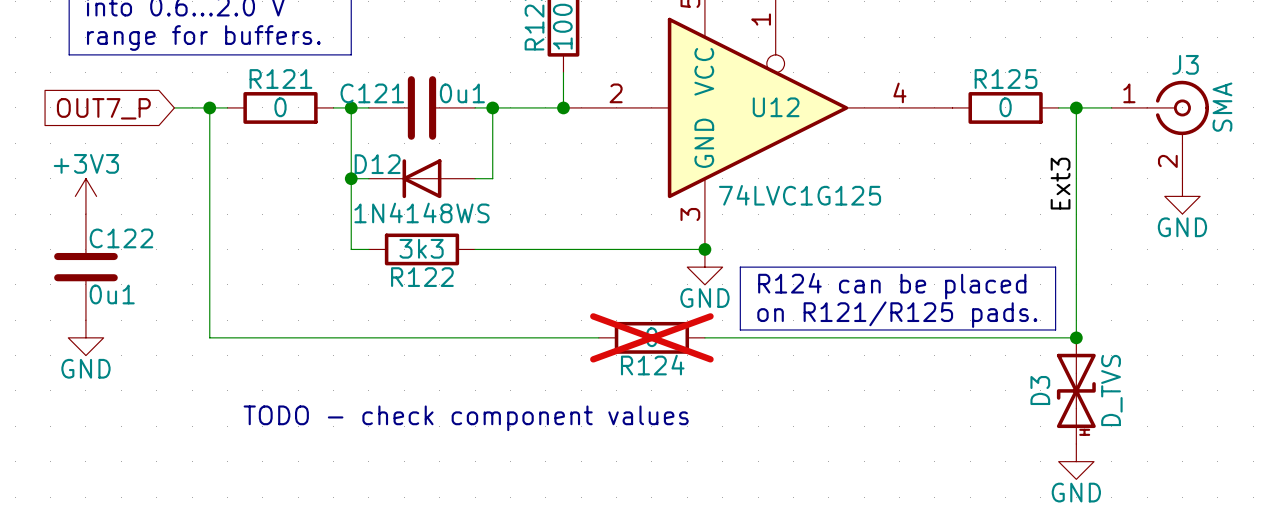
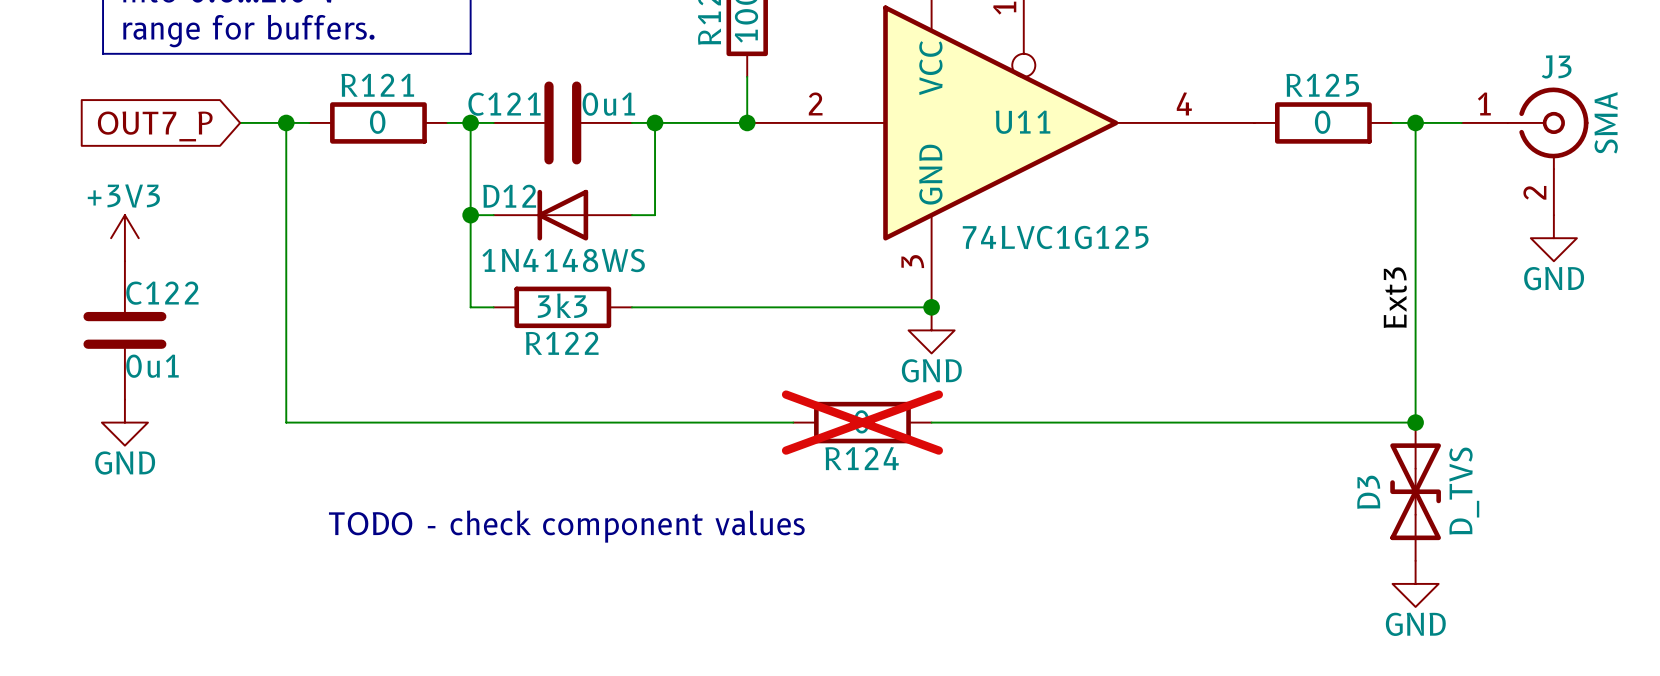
U12 name: U12 (776, 107) -> U11 (1023, 122)
label position: Ext3 (1060, 183) -> Ext3 (1395, 297)
line: (740, 267) (1055, 267) (1055, 329) (740, 329) (740, 267) -> none
text: R124 can be placed (892, 286) -> none
text: on R121/R125 pads. (897, 314) -> none
D3 symbol: [1056, 337, 1096, 444] -> [1390, 422, 1441, 561]

